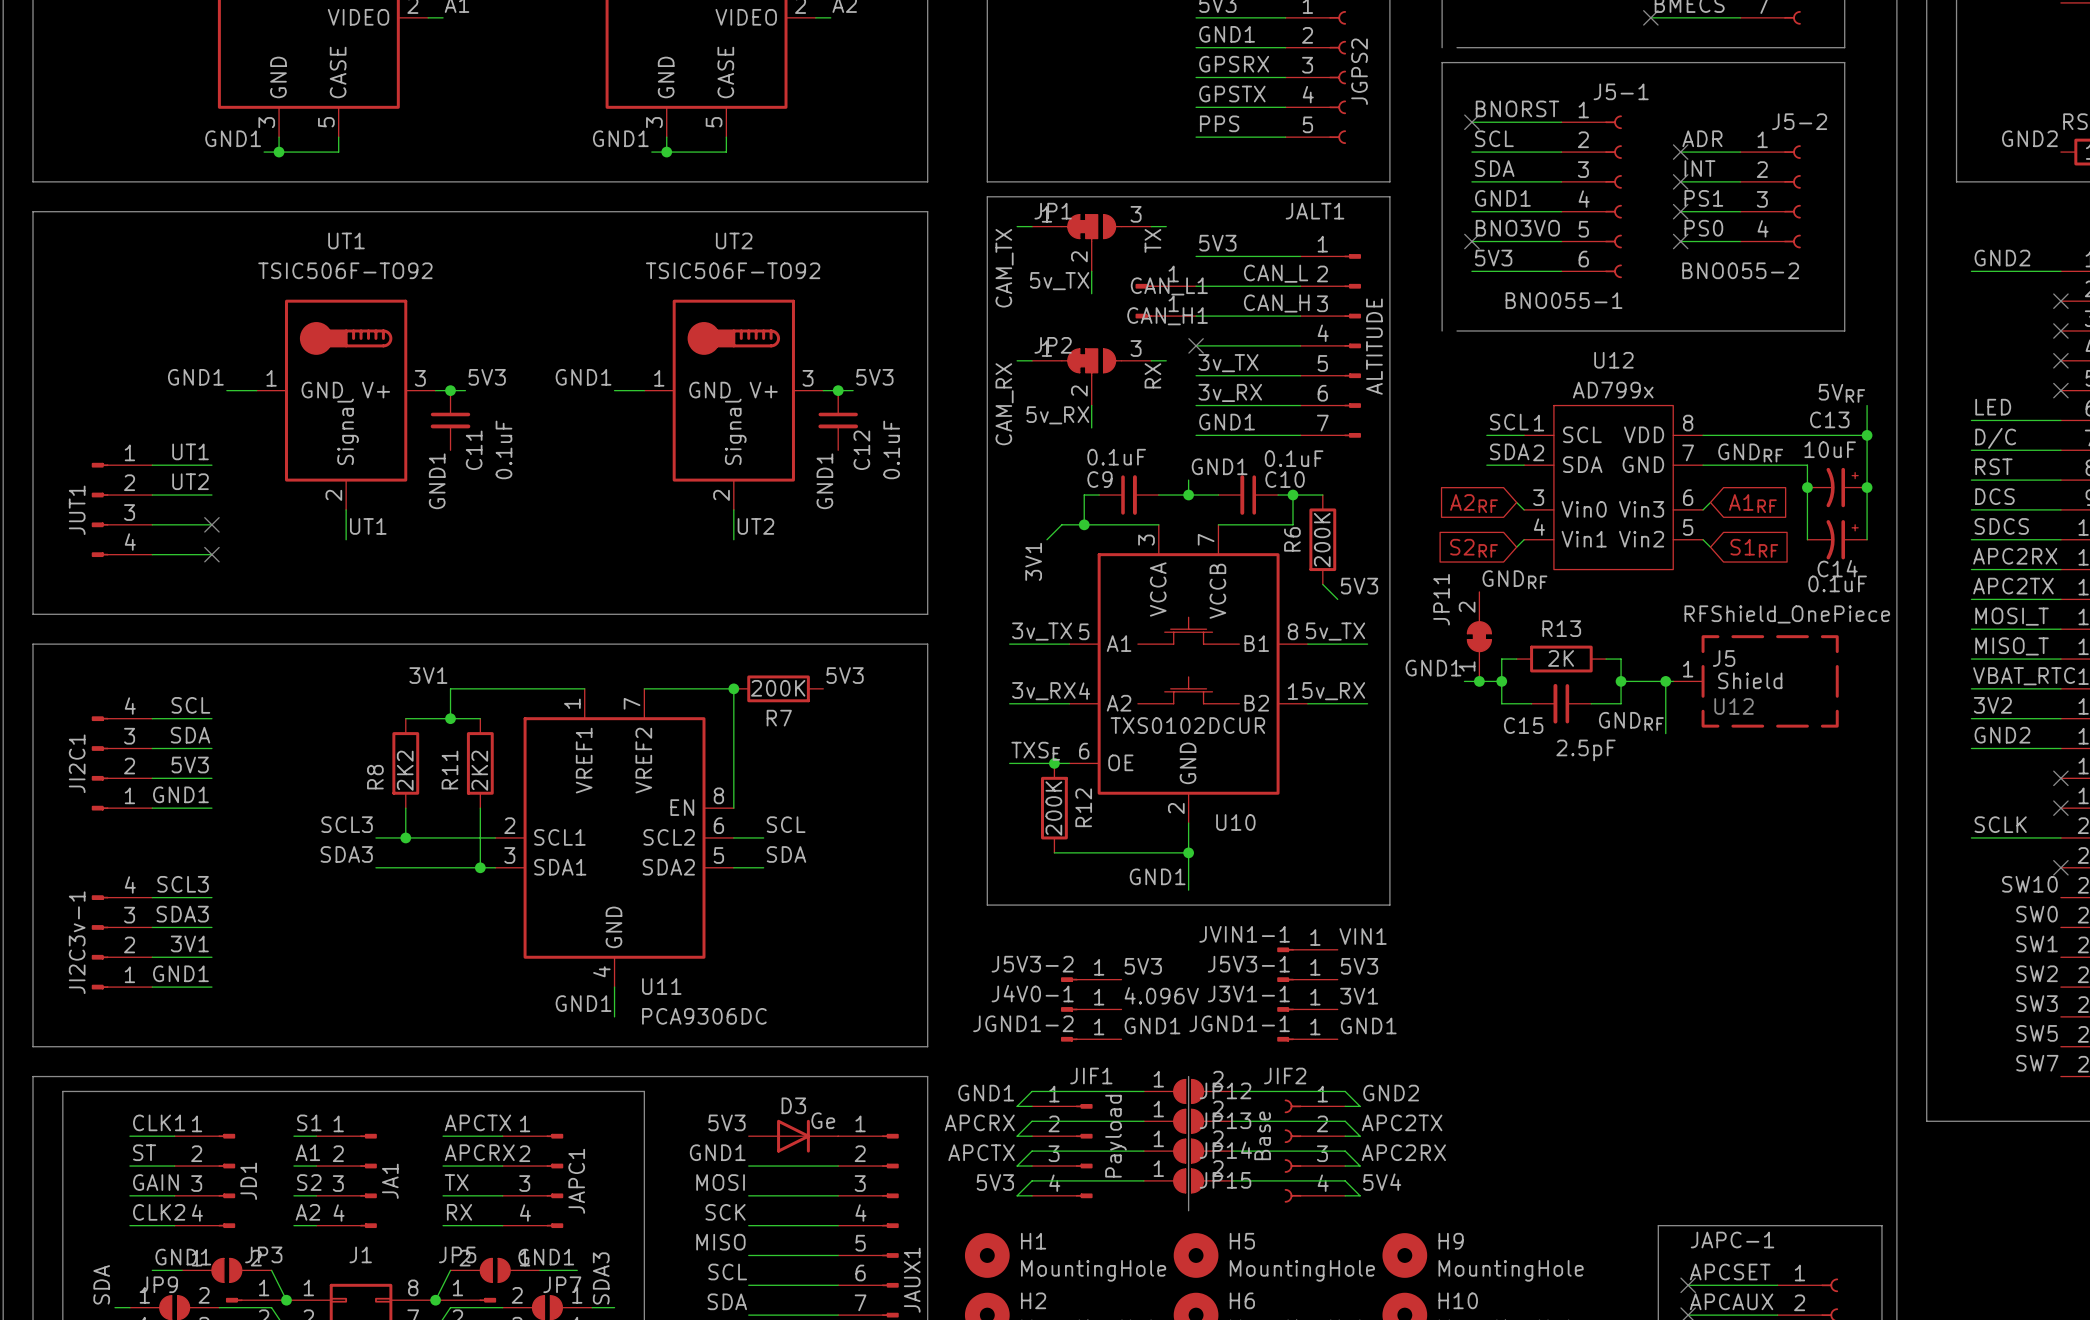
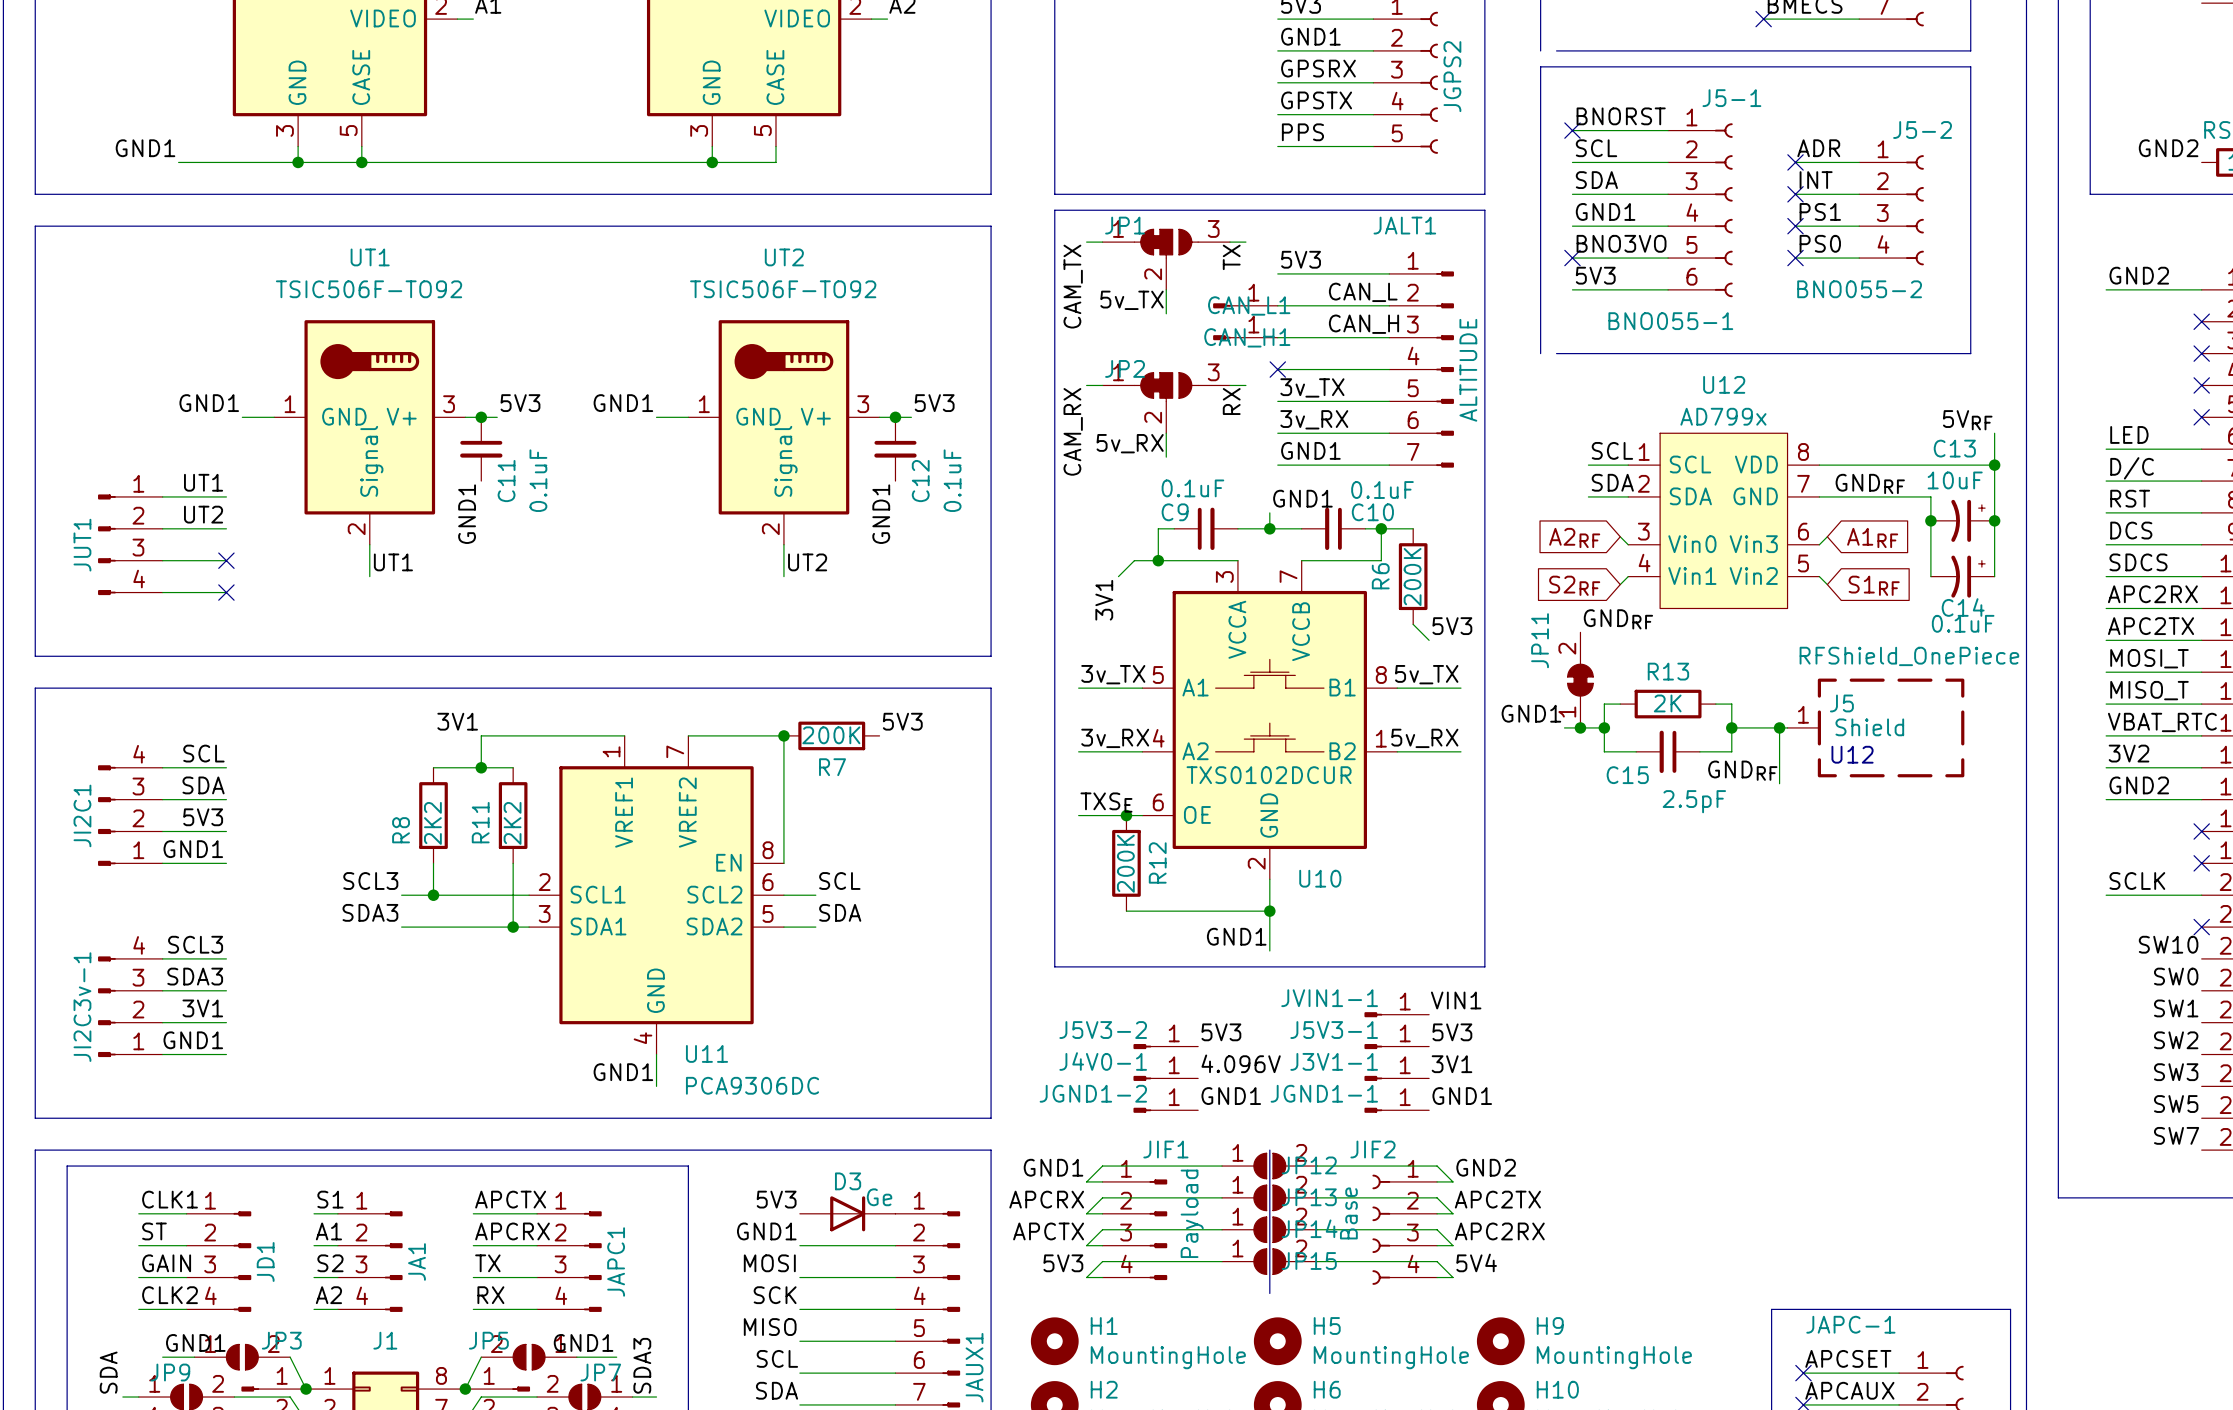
label position: GND1 (233, 138) -> GND1 (145, 148)
label: GND1 (620, 138) -> none
wire: none -> (178, 162) (282, 162)
wire: none -> (361, 162) (696, 162)
junction: none -> (361, 162)

